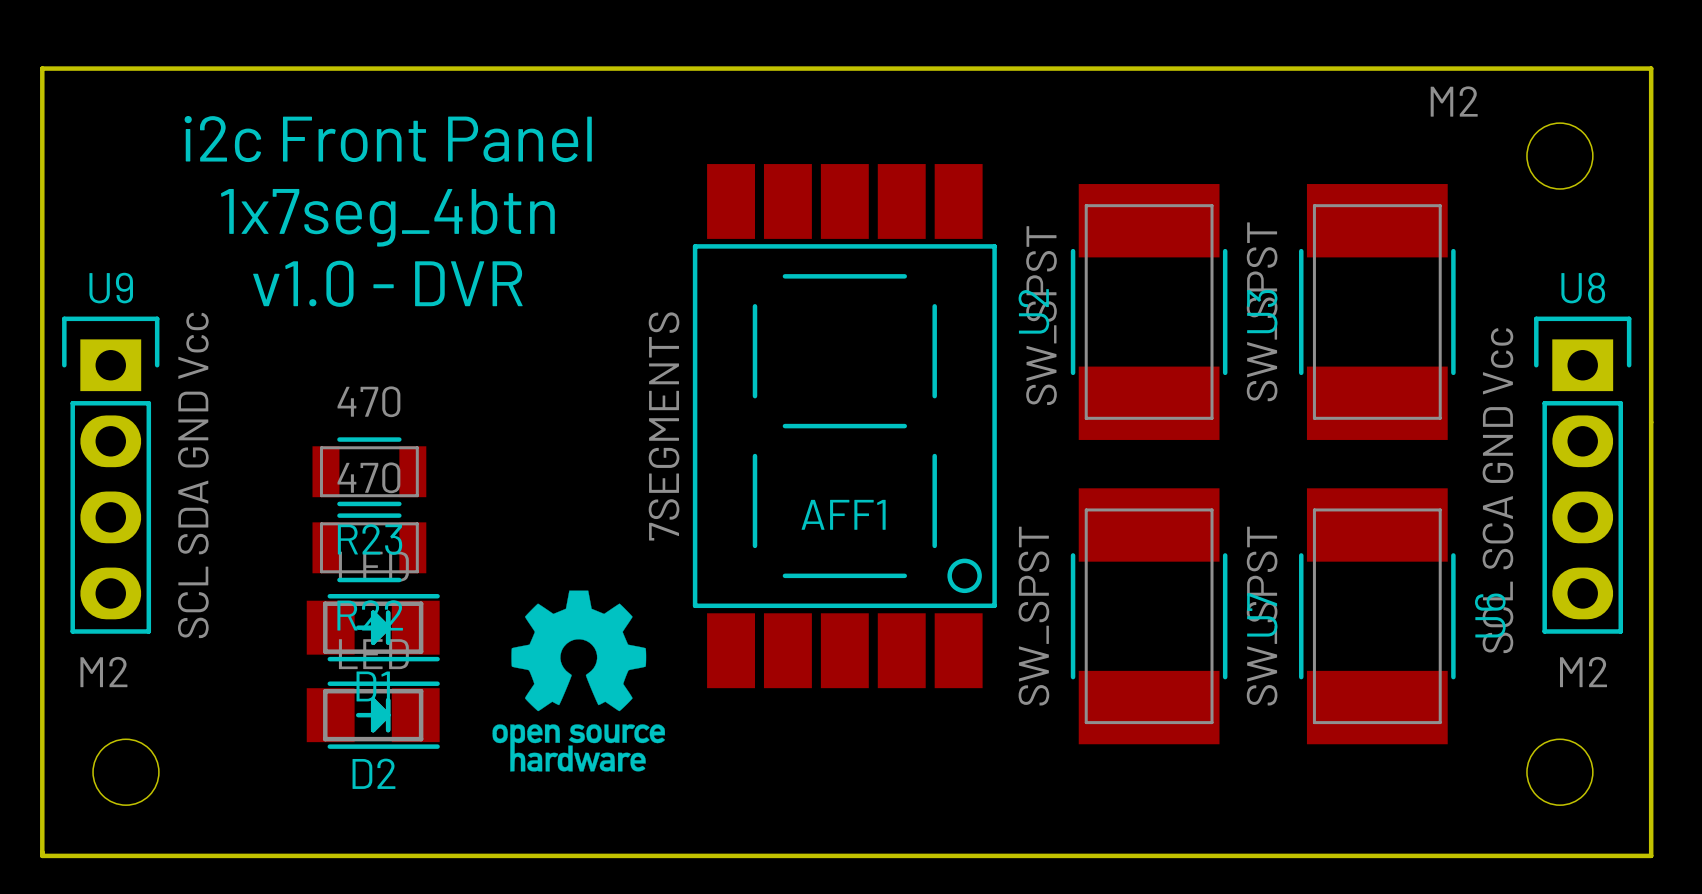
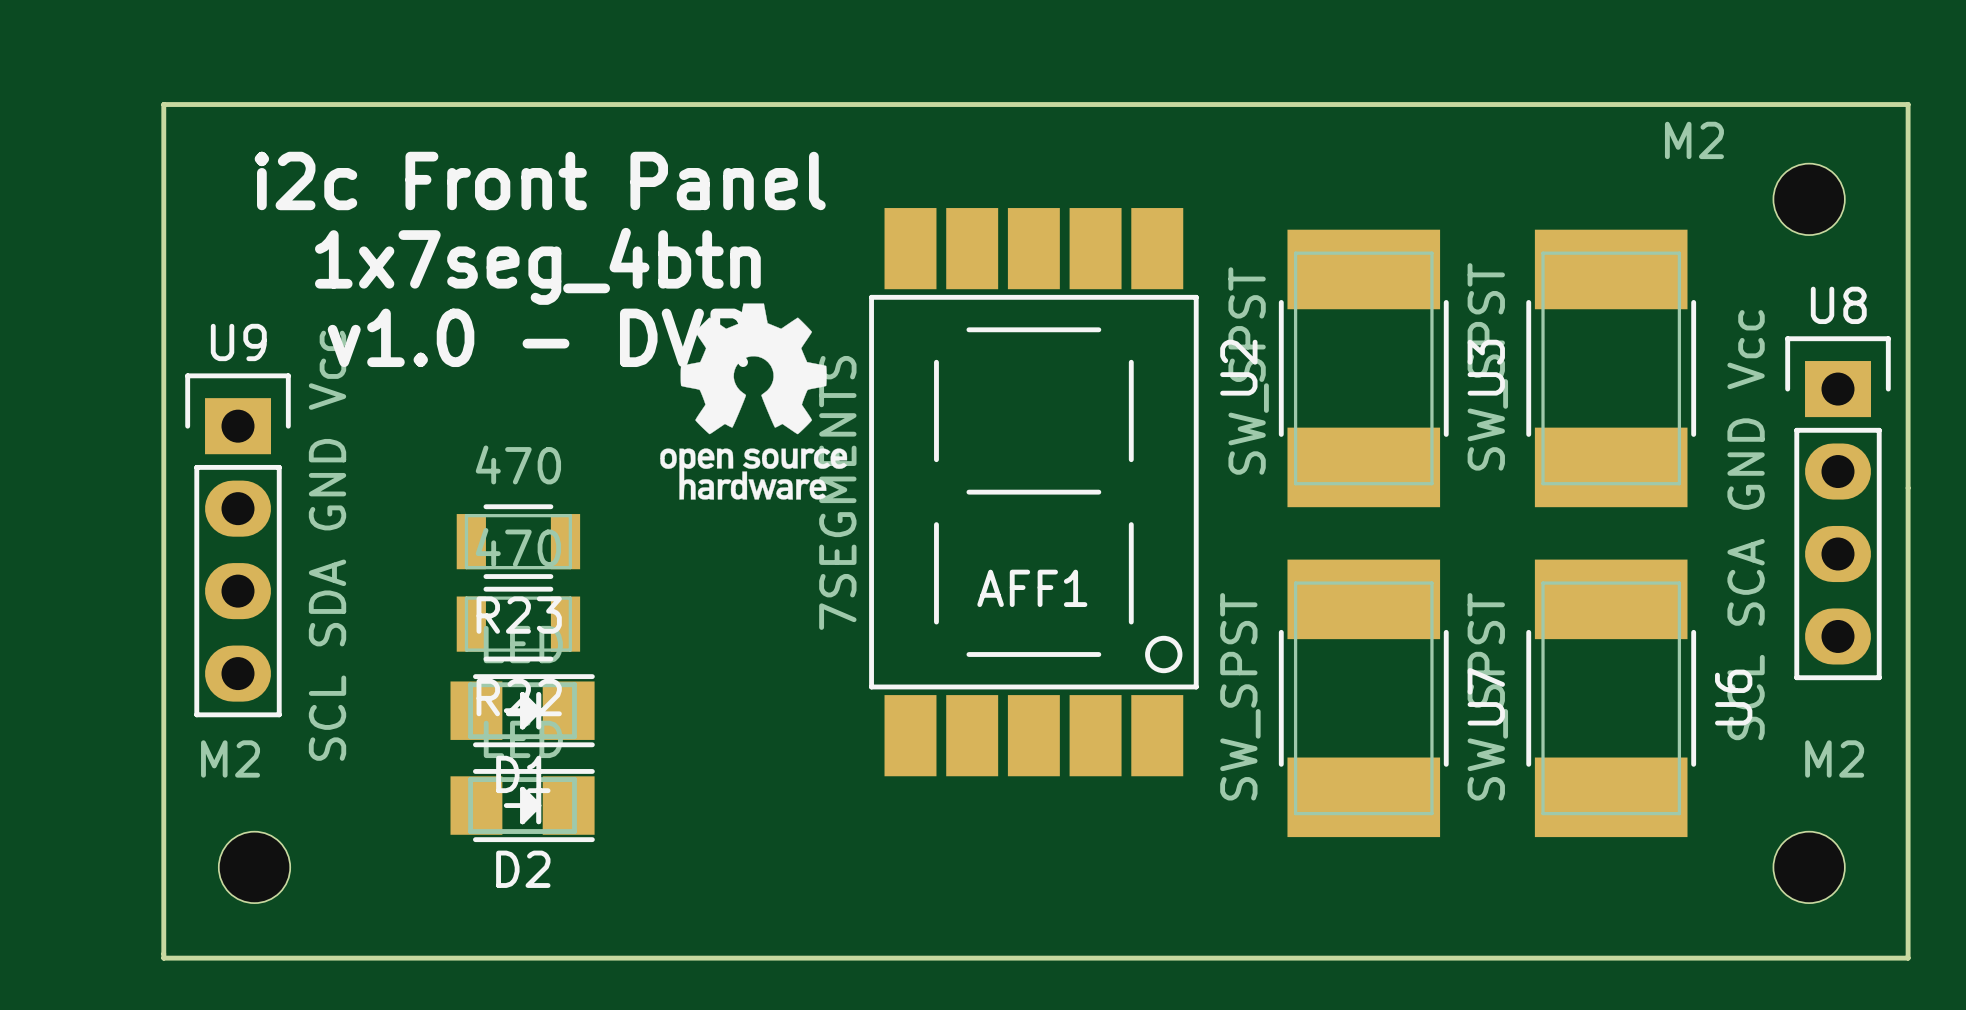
U8 position: (1582, 475) -> (1838, 508)
drawing position: (578, 681) -> (753, 401)

